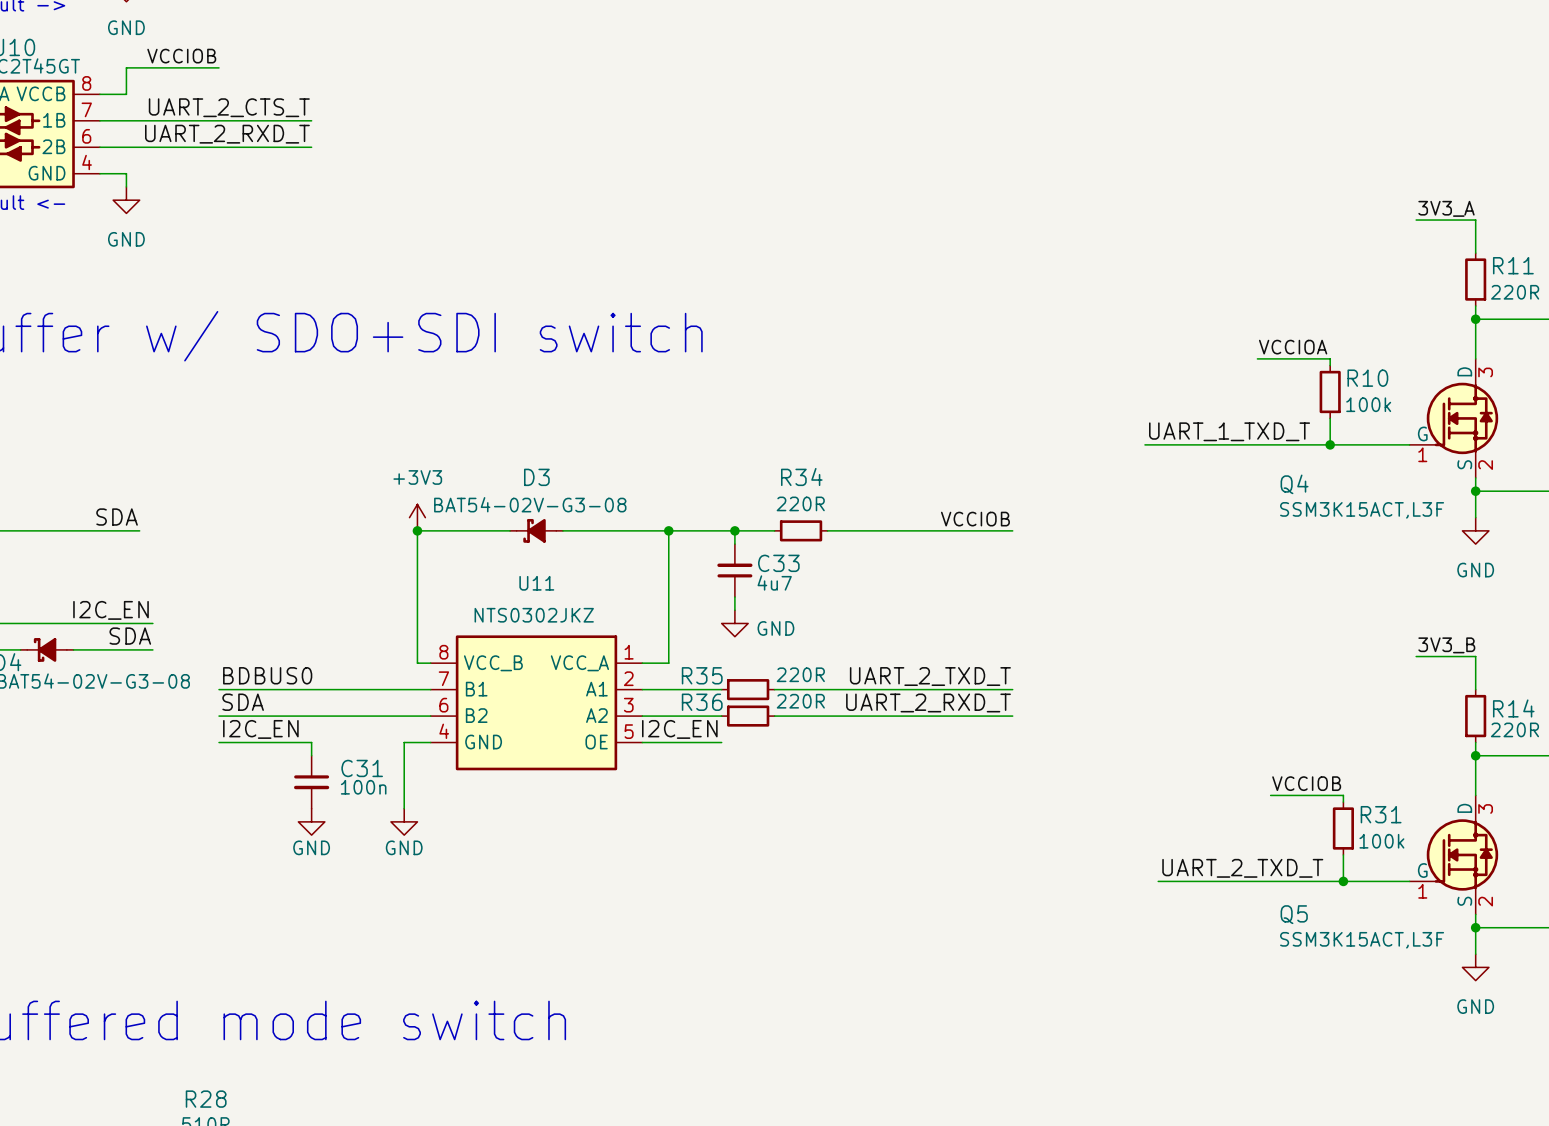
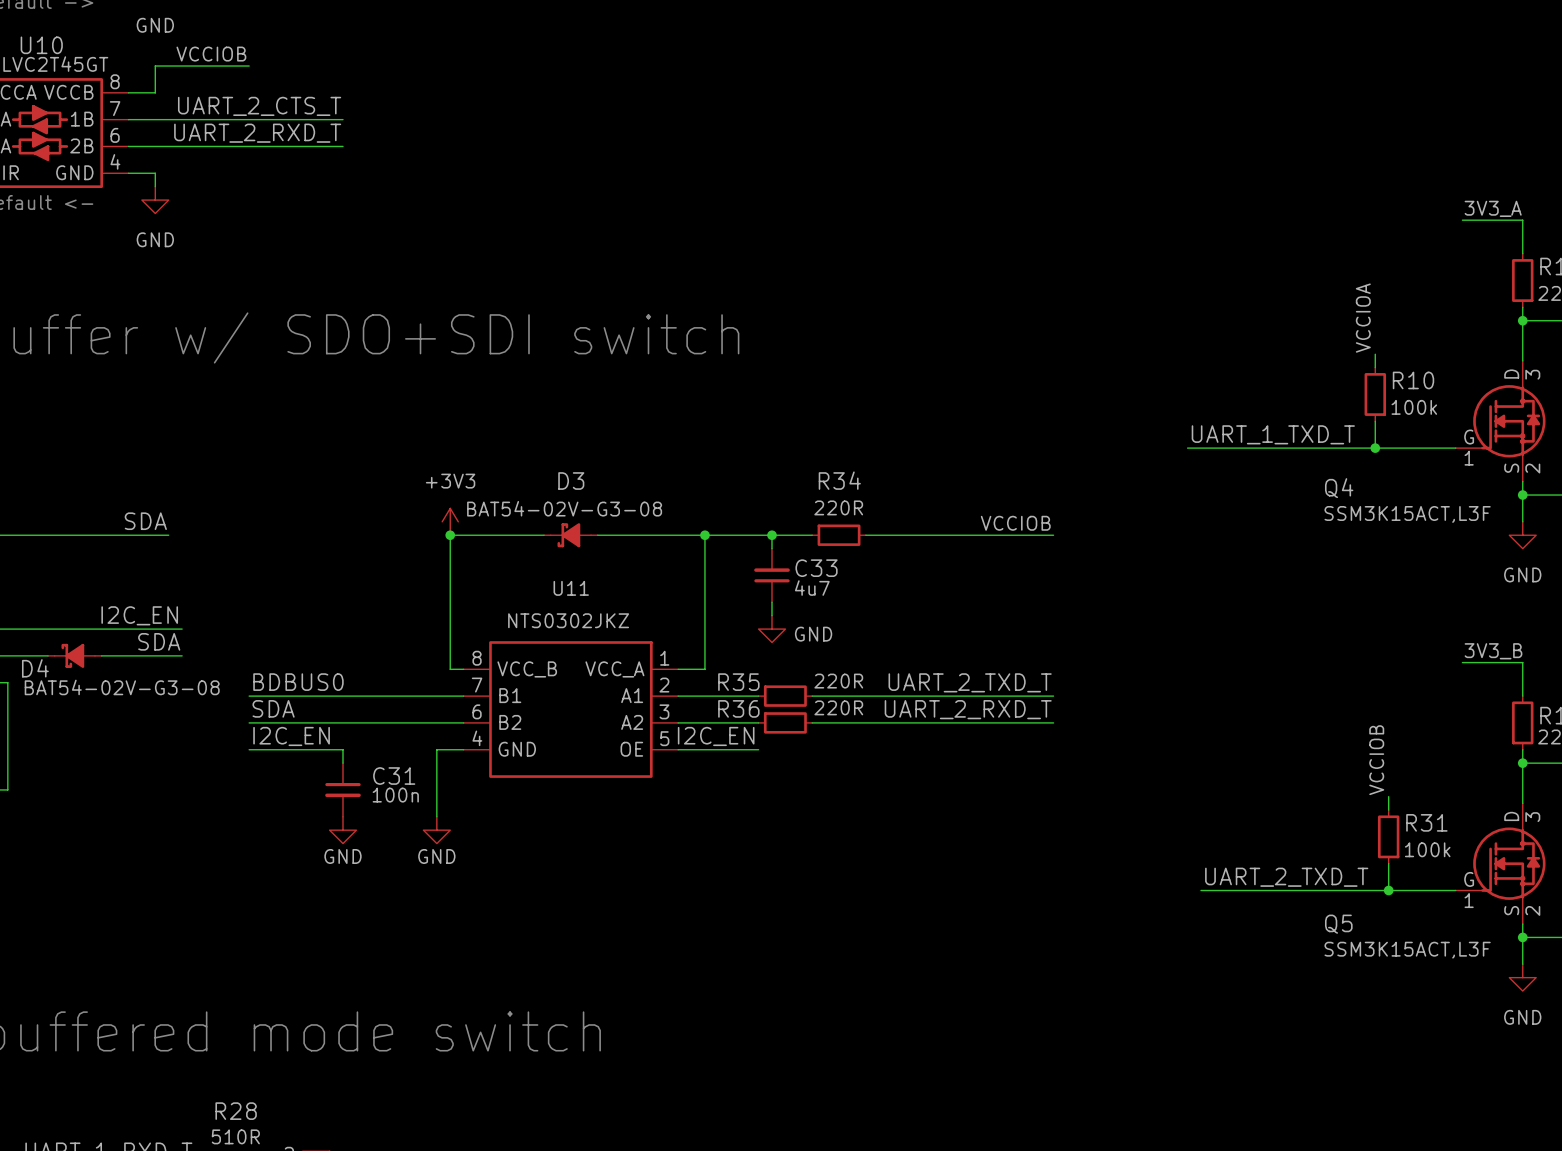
label rotation: 0° (1293, 347) -> 90° counterclockwise (1363, 318)
wire: (1257, 358) (1330, 358) -> (1375, 354) (1375, 360)
label rotation: 0° (1306, 783) -> 90° counterclockwise (1376, 760)
wire: (1270, 795) (1343, 795) -> (1388, 796) (1388, 803)

